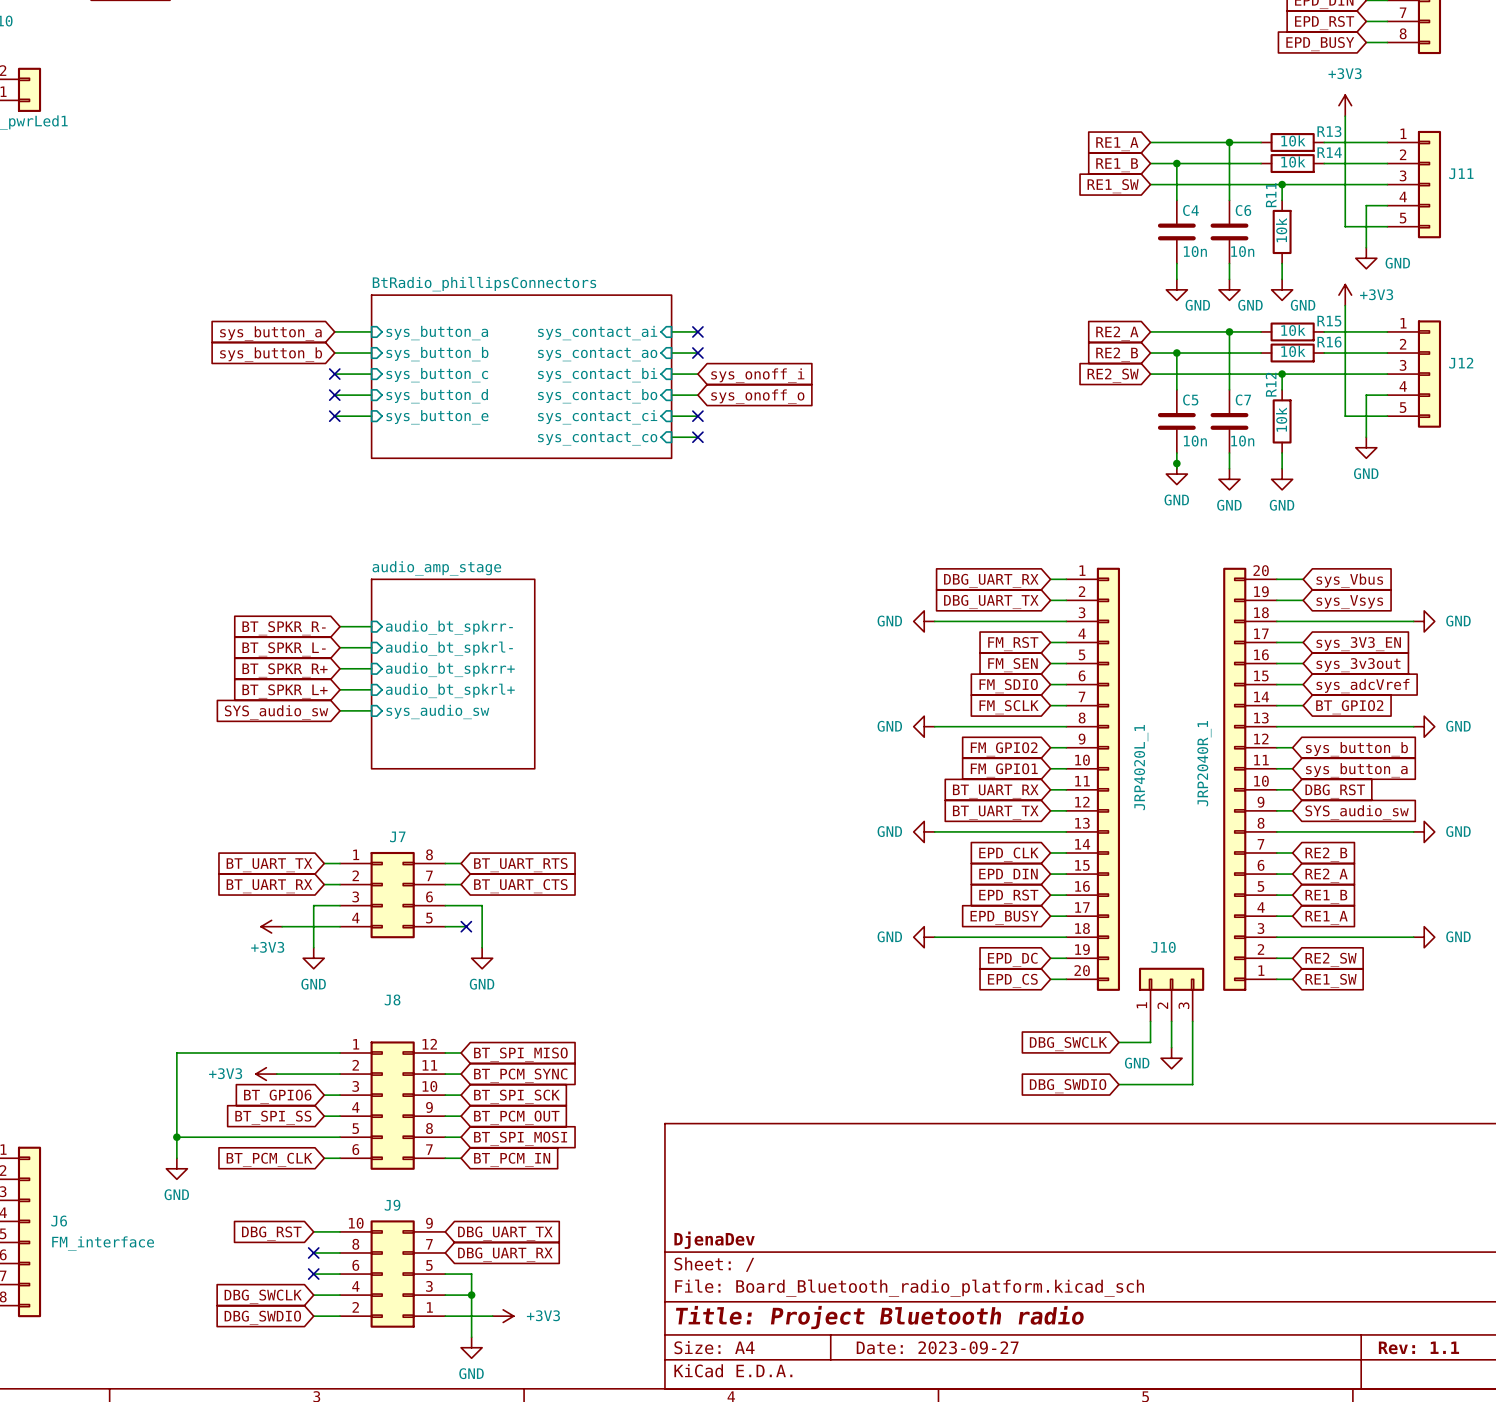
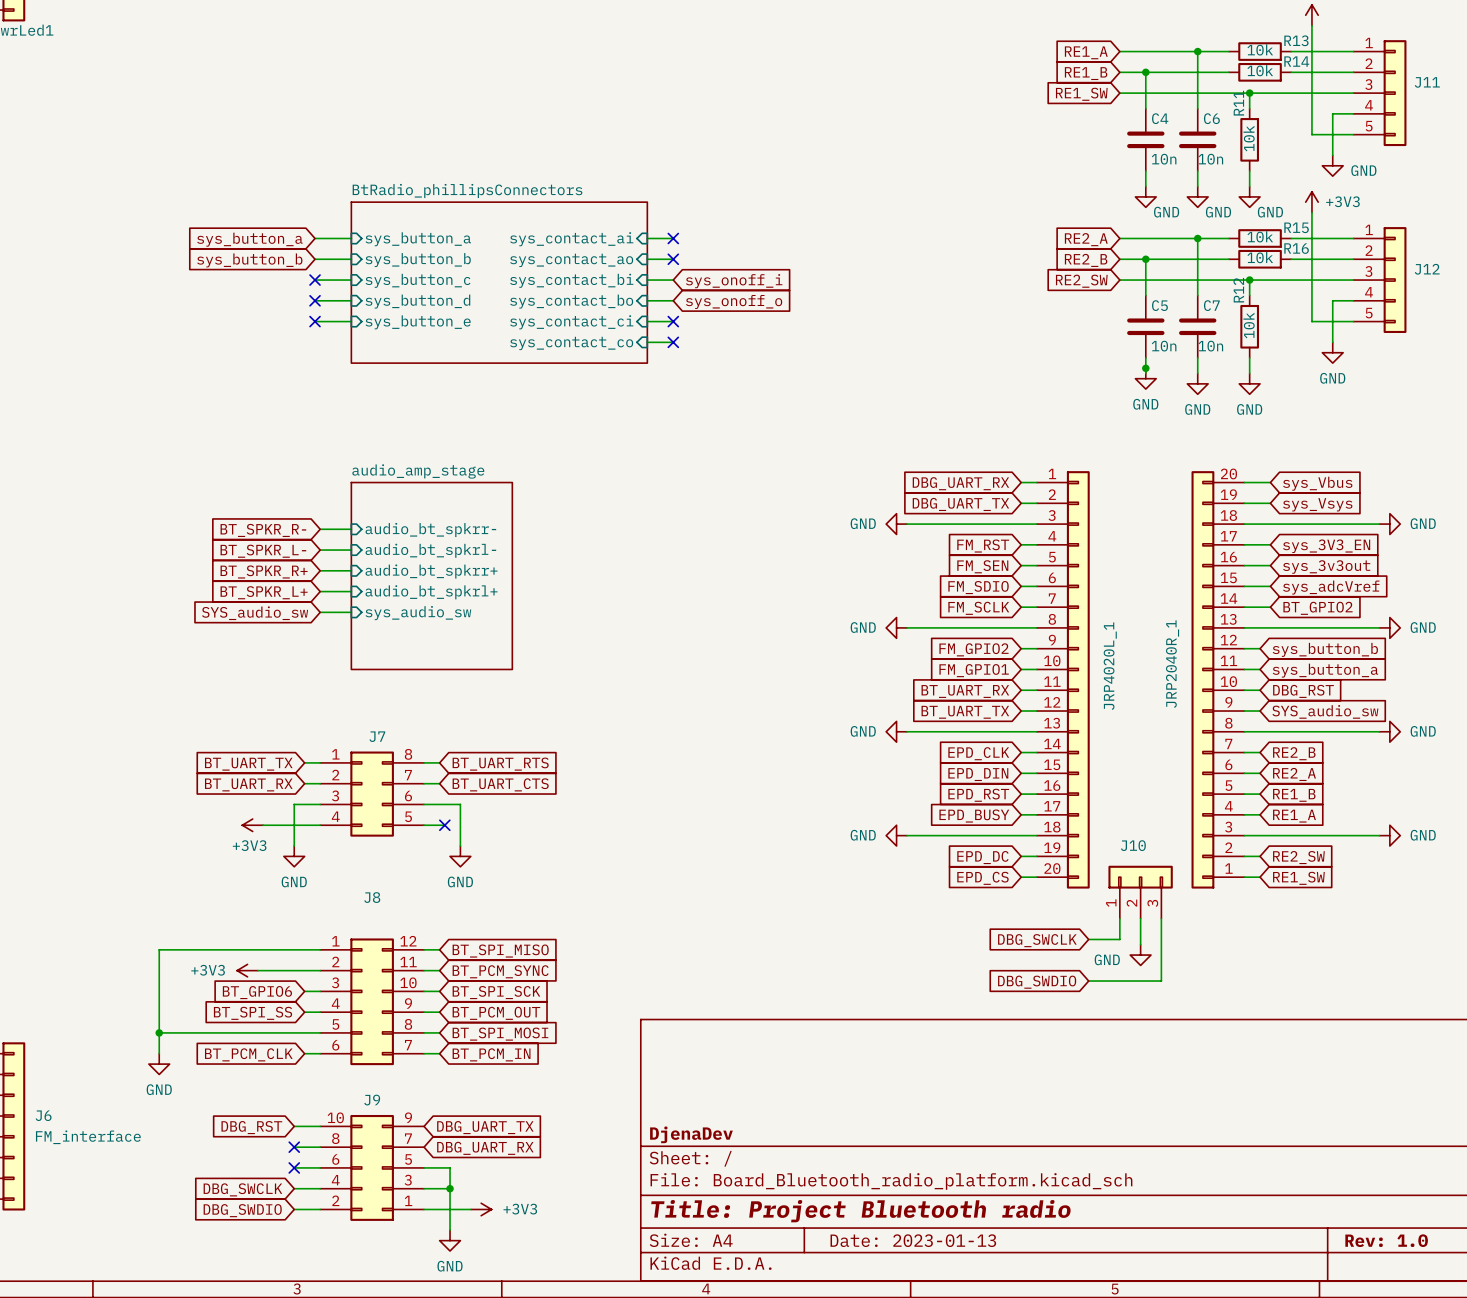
title block: Date: 2023-09-27 (937, 1347) -> Date: 2023-01-13 (913, 1240)
title block: Rev: 1.1 (1418, 1347) -> Rev: 1.0 (1386, 1240)

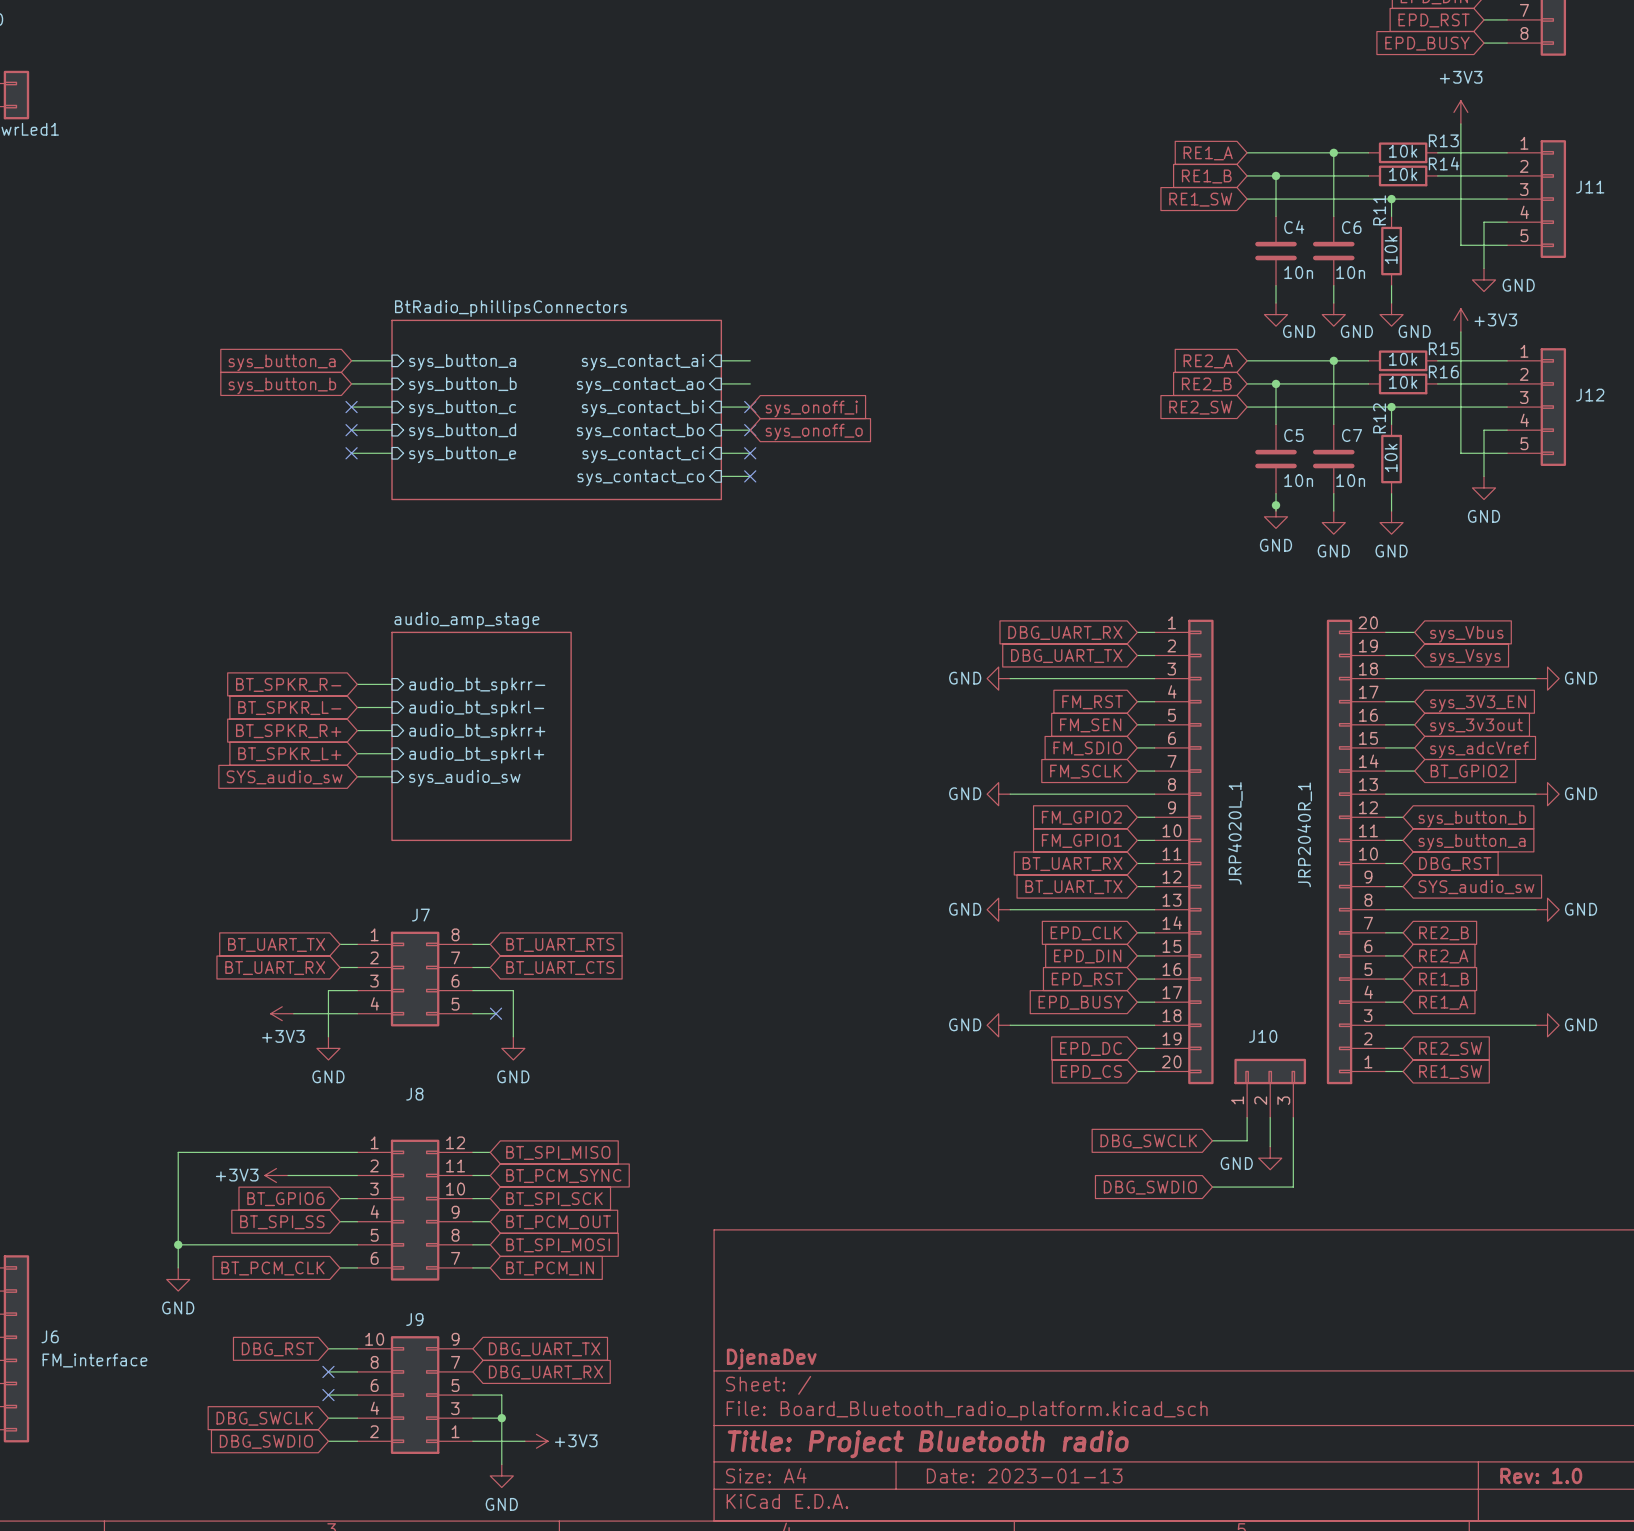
no-connect mark: (673, 238) -> none
no-connect mark: (673, 259) -> none
no-connect mark: none -> (750, 407)
no-connect mark: none -> (750, 430)

